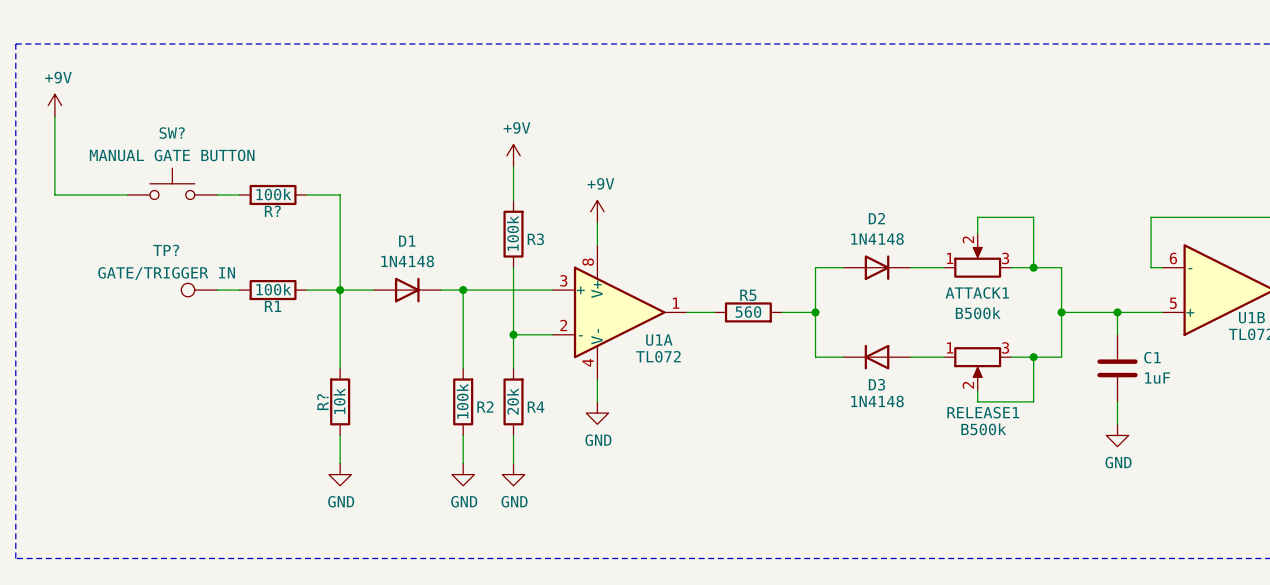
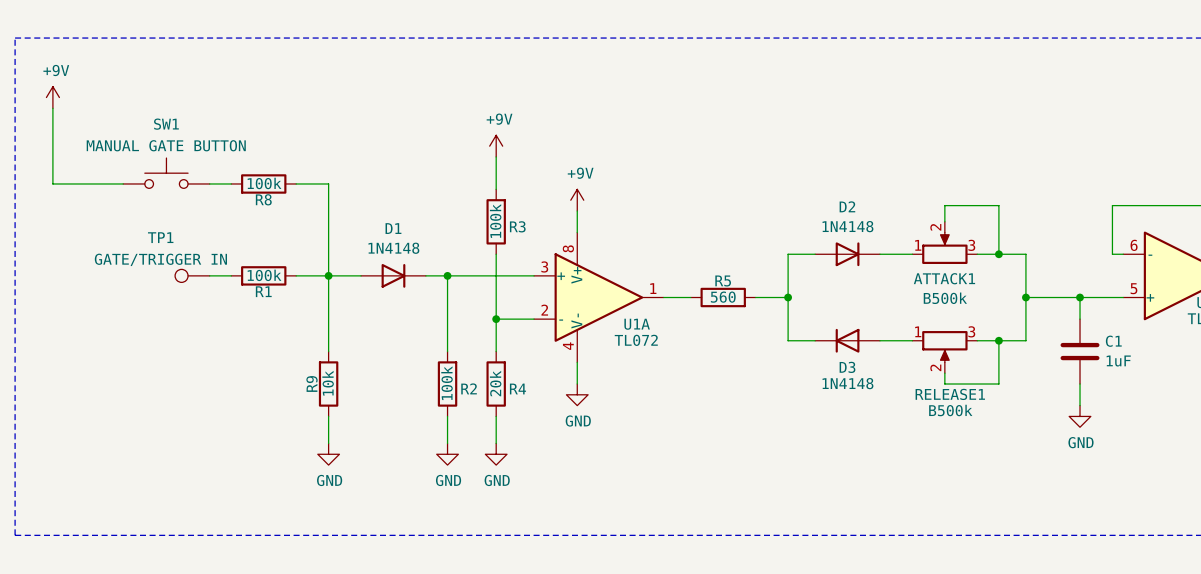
SW? name: SW? (172, 133) -> SW1 (166, 124)
R? name: R? (272, 211) -> R8 (263, 199)
TP? name: TP? (166, 250) -> TP1 (160, 237)
R? name: R? (322, 402) -> R9 (312, 383)

